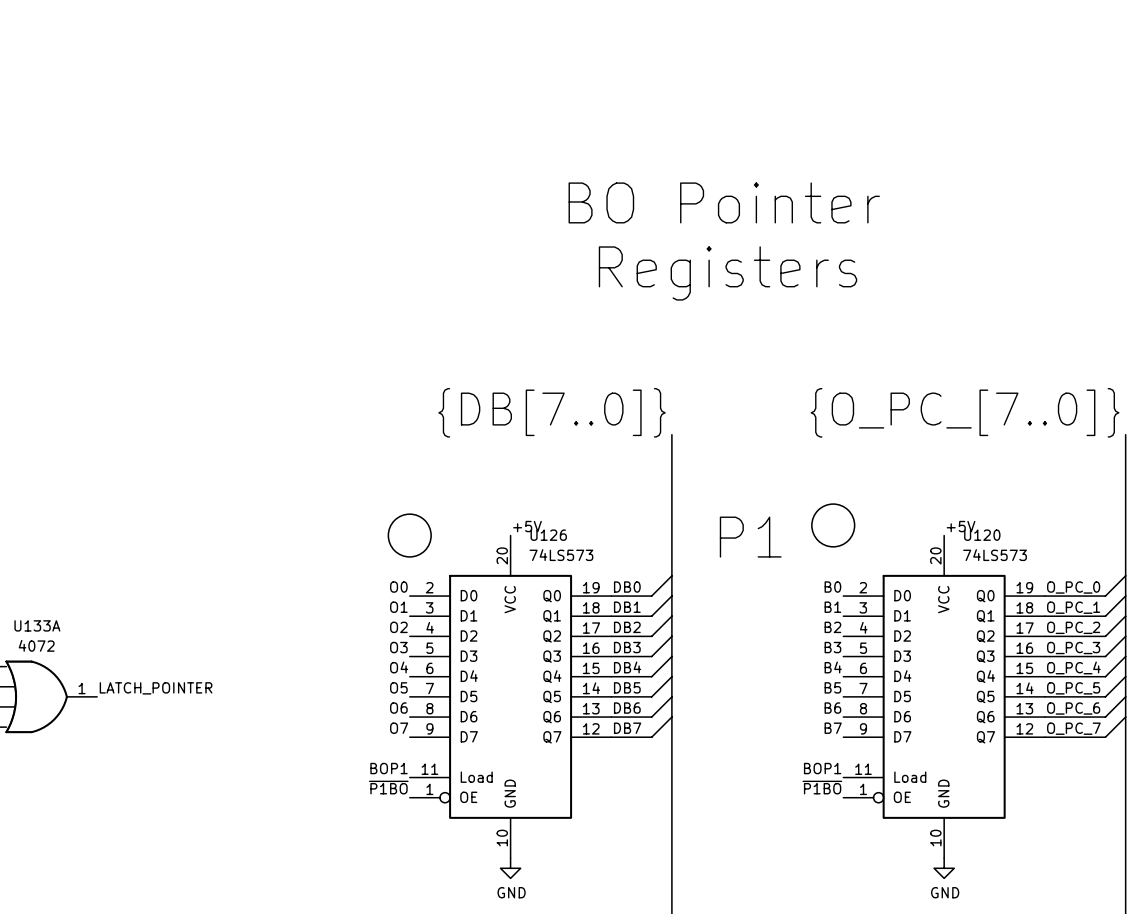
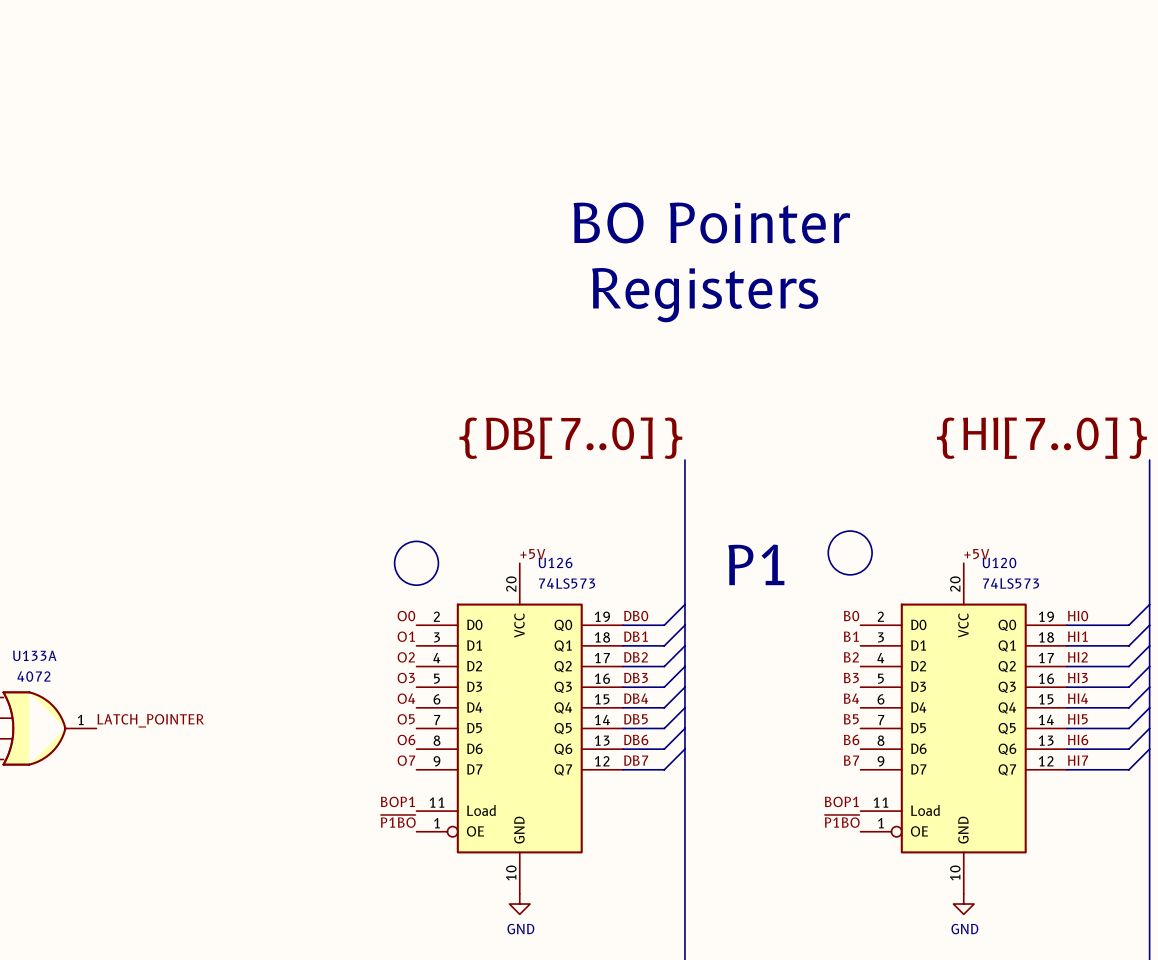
label: {O_PC_[7..0]} (965, 412) -> {HI[7..0]} (1041, 438)
label: O_PC_0 (1073, 587) -> HI0 (1078, 616)
label: O_PC_1 (1073, 607) -> HI1 (1077, 636)
label: O_PC_2 (1073, 627) -> HI2 (1077, 657)
label: O_PC_3 (1073, 648) -> HI3 (1077, 677)
label: O_PC_4 (1073, 667) -> HI4 (1078, 698)
label: O_PC_5 (1073, 688) -> HI5 (1077, 719)
label: O_PC_6 (1073, 708) -> HI6 (1078, 739)
label: O_PC_7 (1073, 728) -> HI7 (1078, 760)

